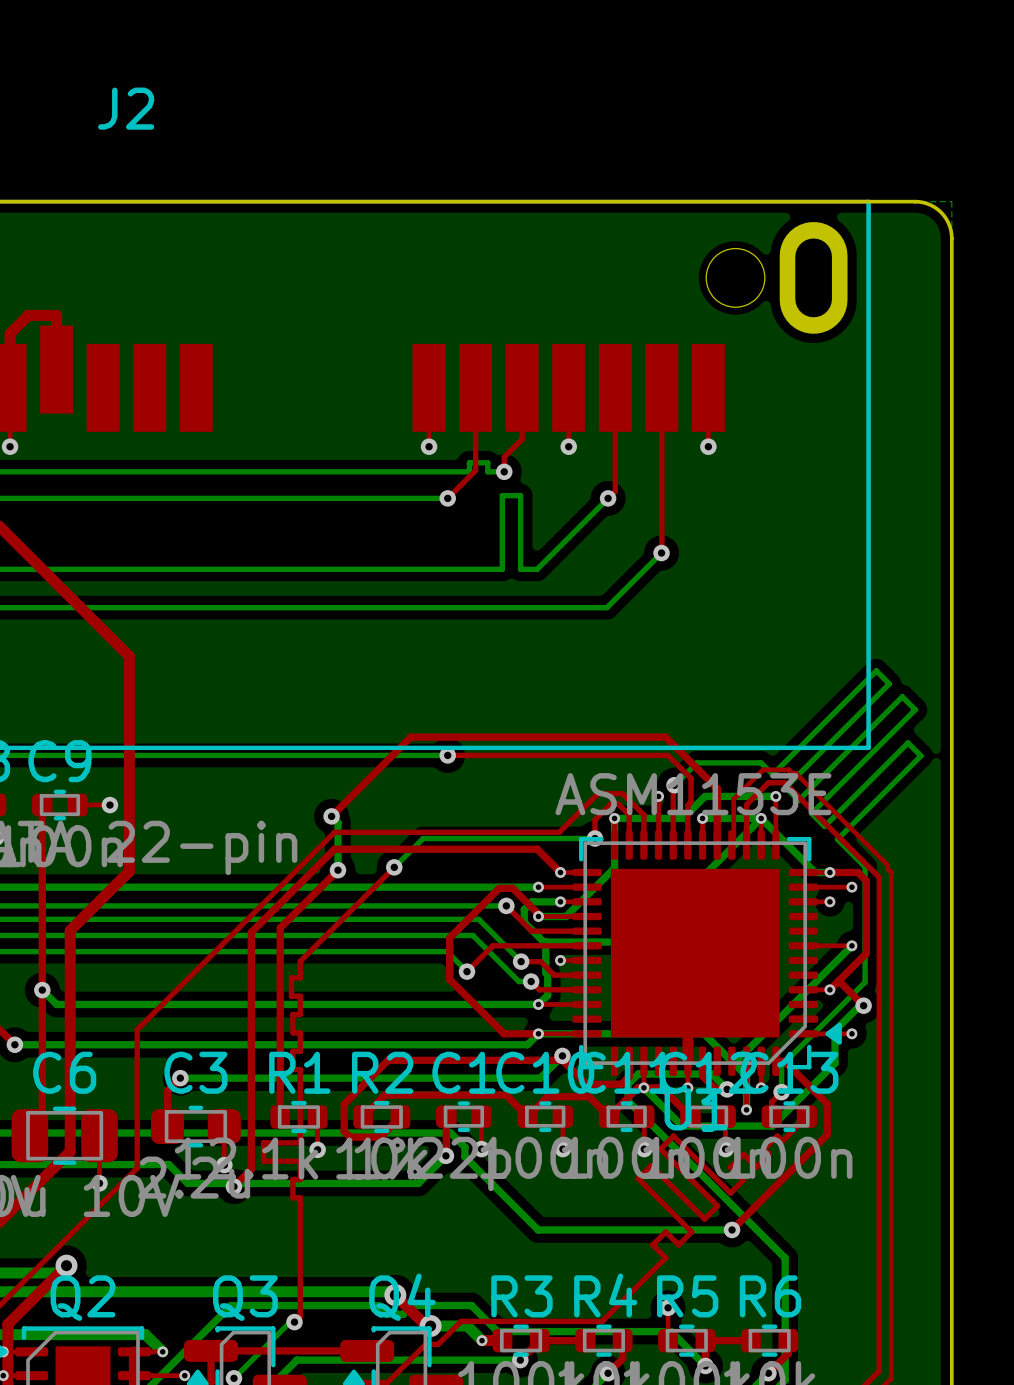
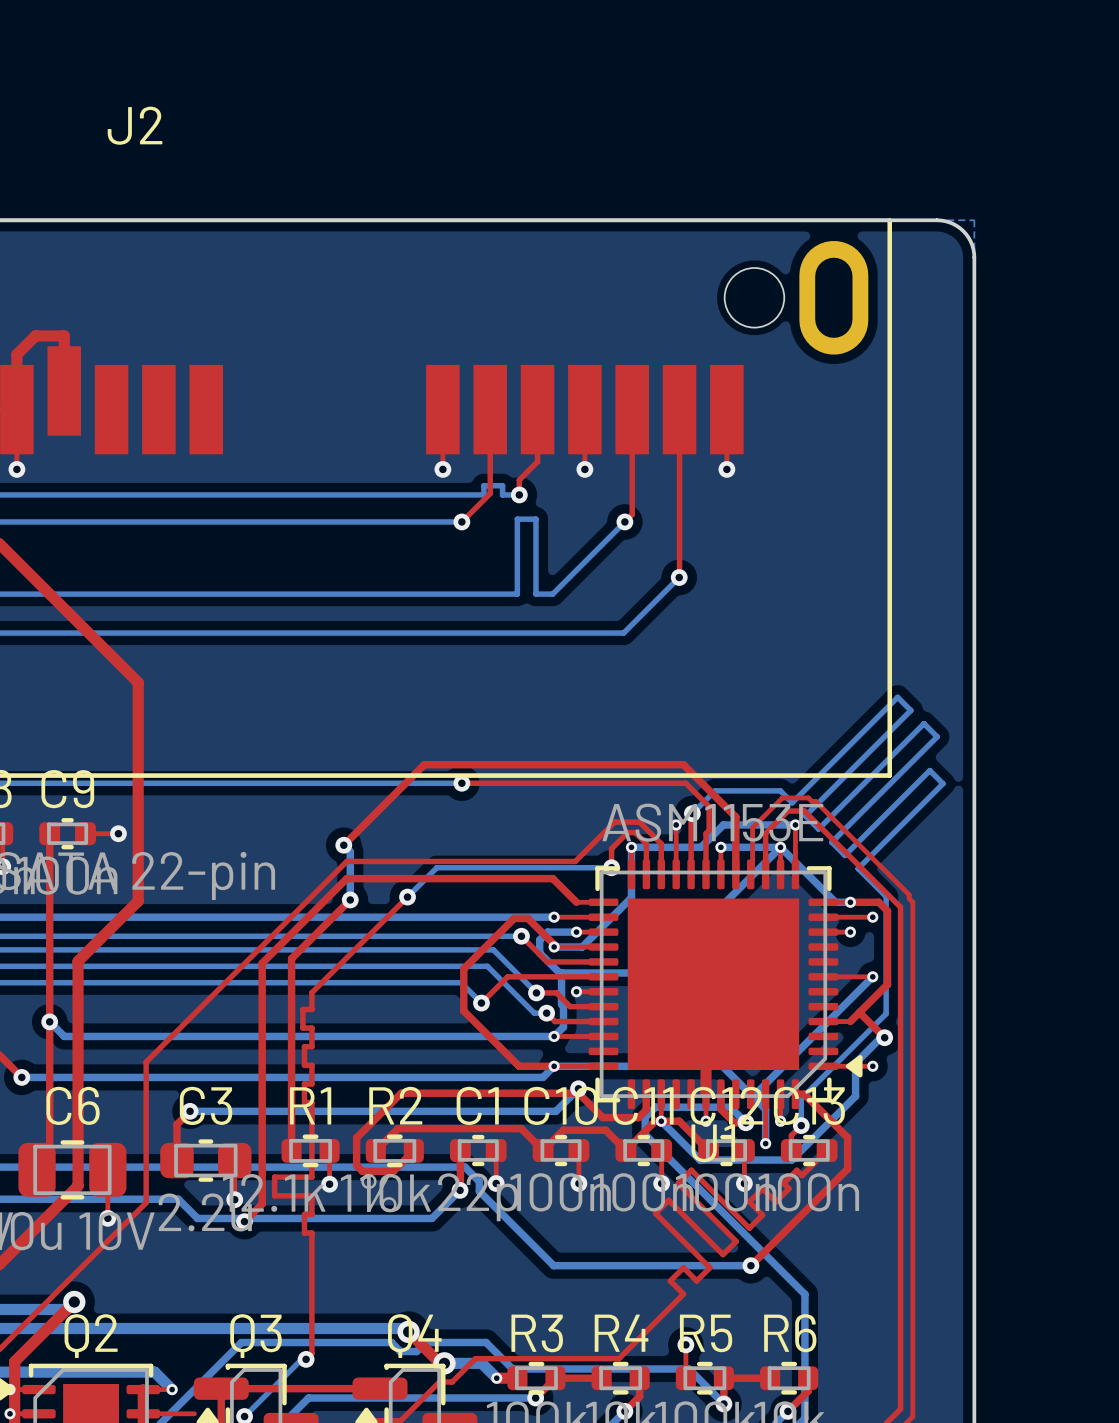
via: (560, 872) -> none
via: (829, 989) -> none
via: (184, 1375) -> none

